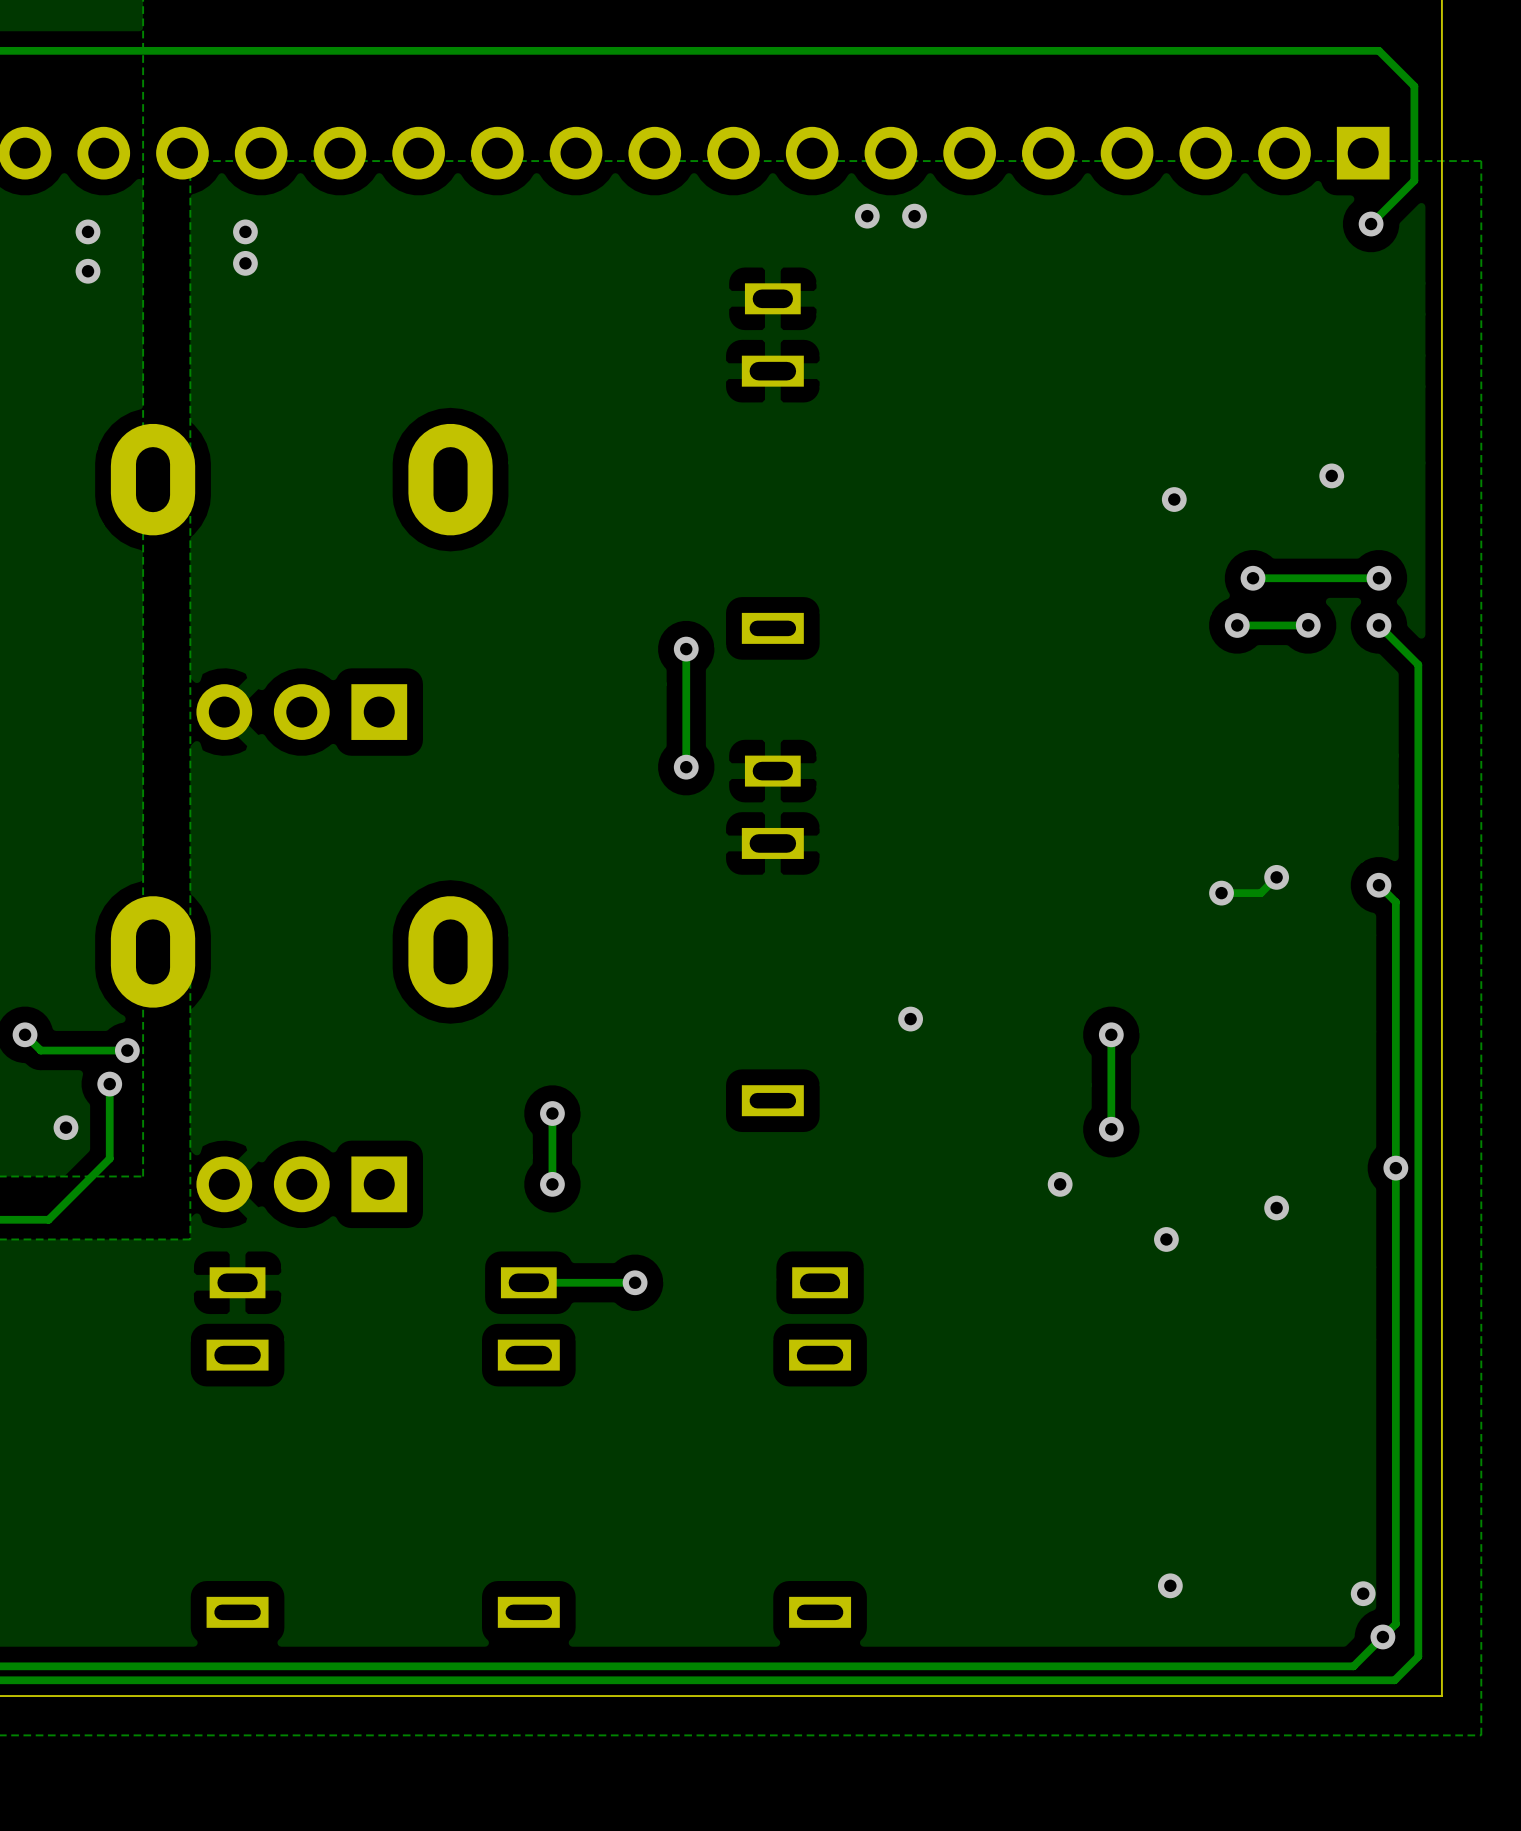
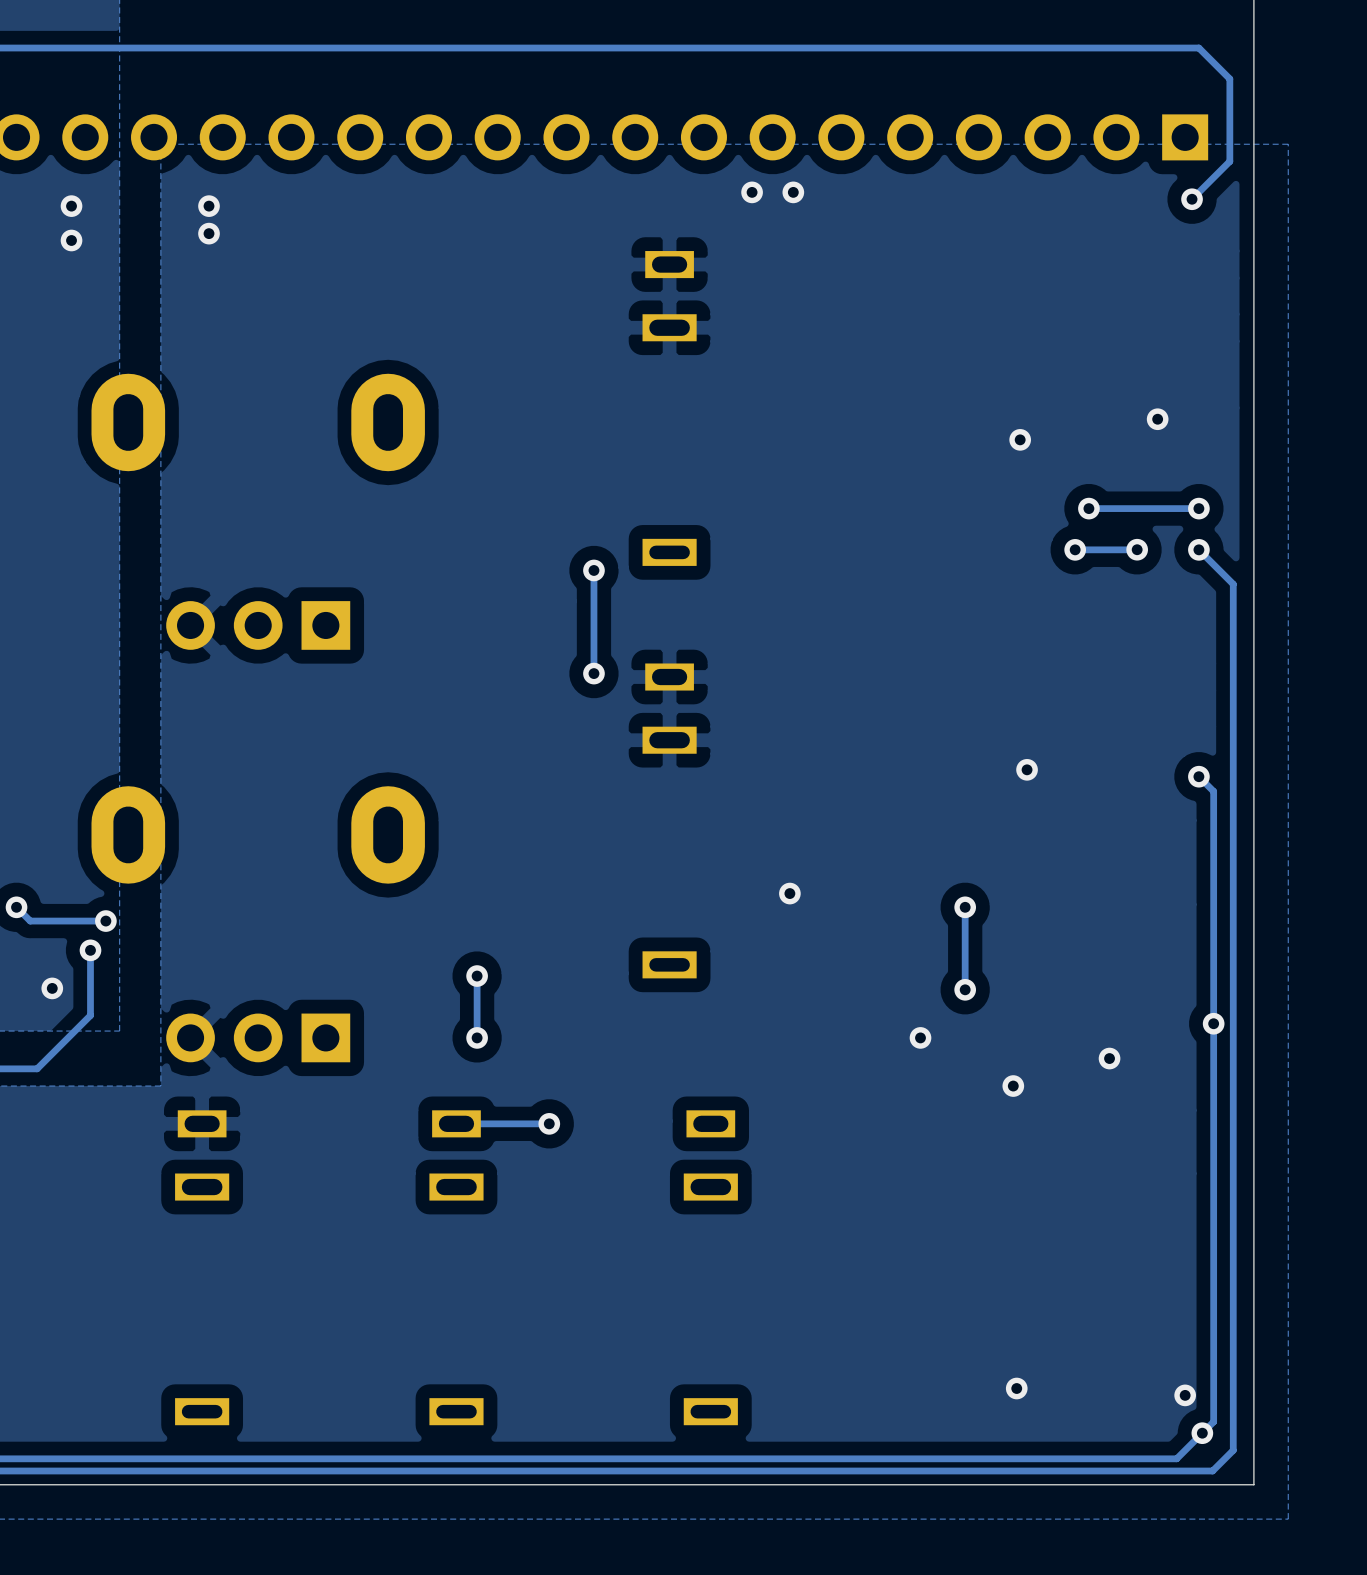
track: (1276, 877) (1260, 893) (1221, 893) -> none
via: (1276, 877) -> none
via position: (1221, 893) -> (1027, 769)

